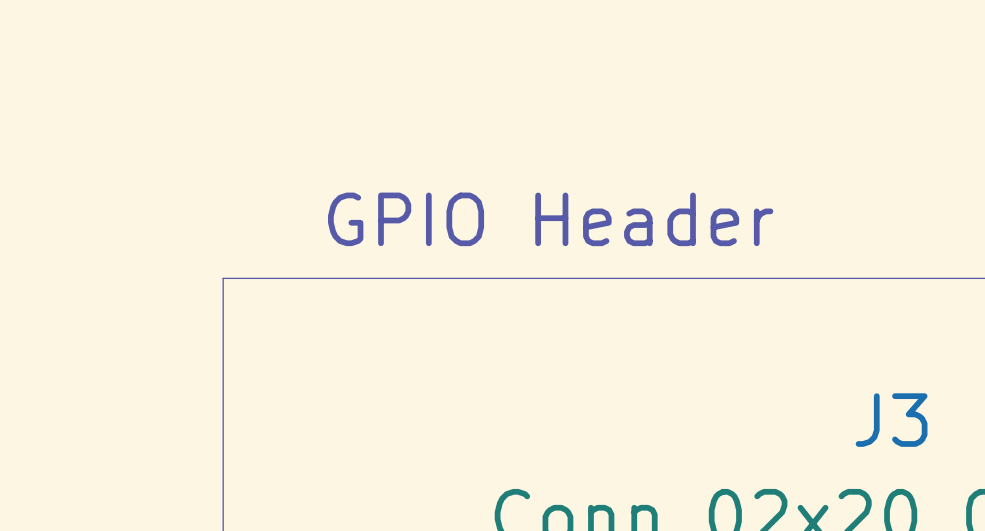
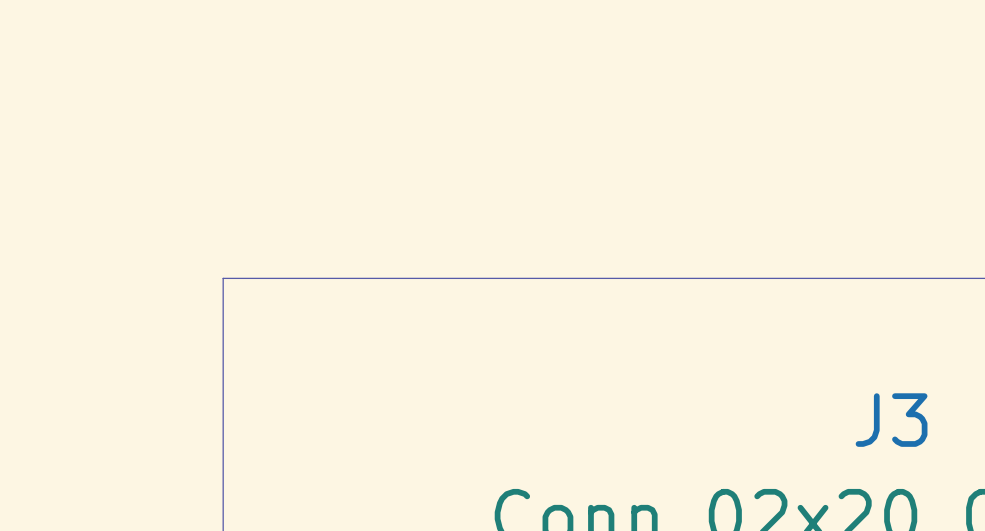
text: GPIO Header (550, 219) -> none

